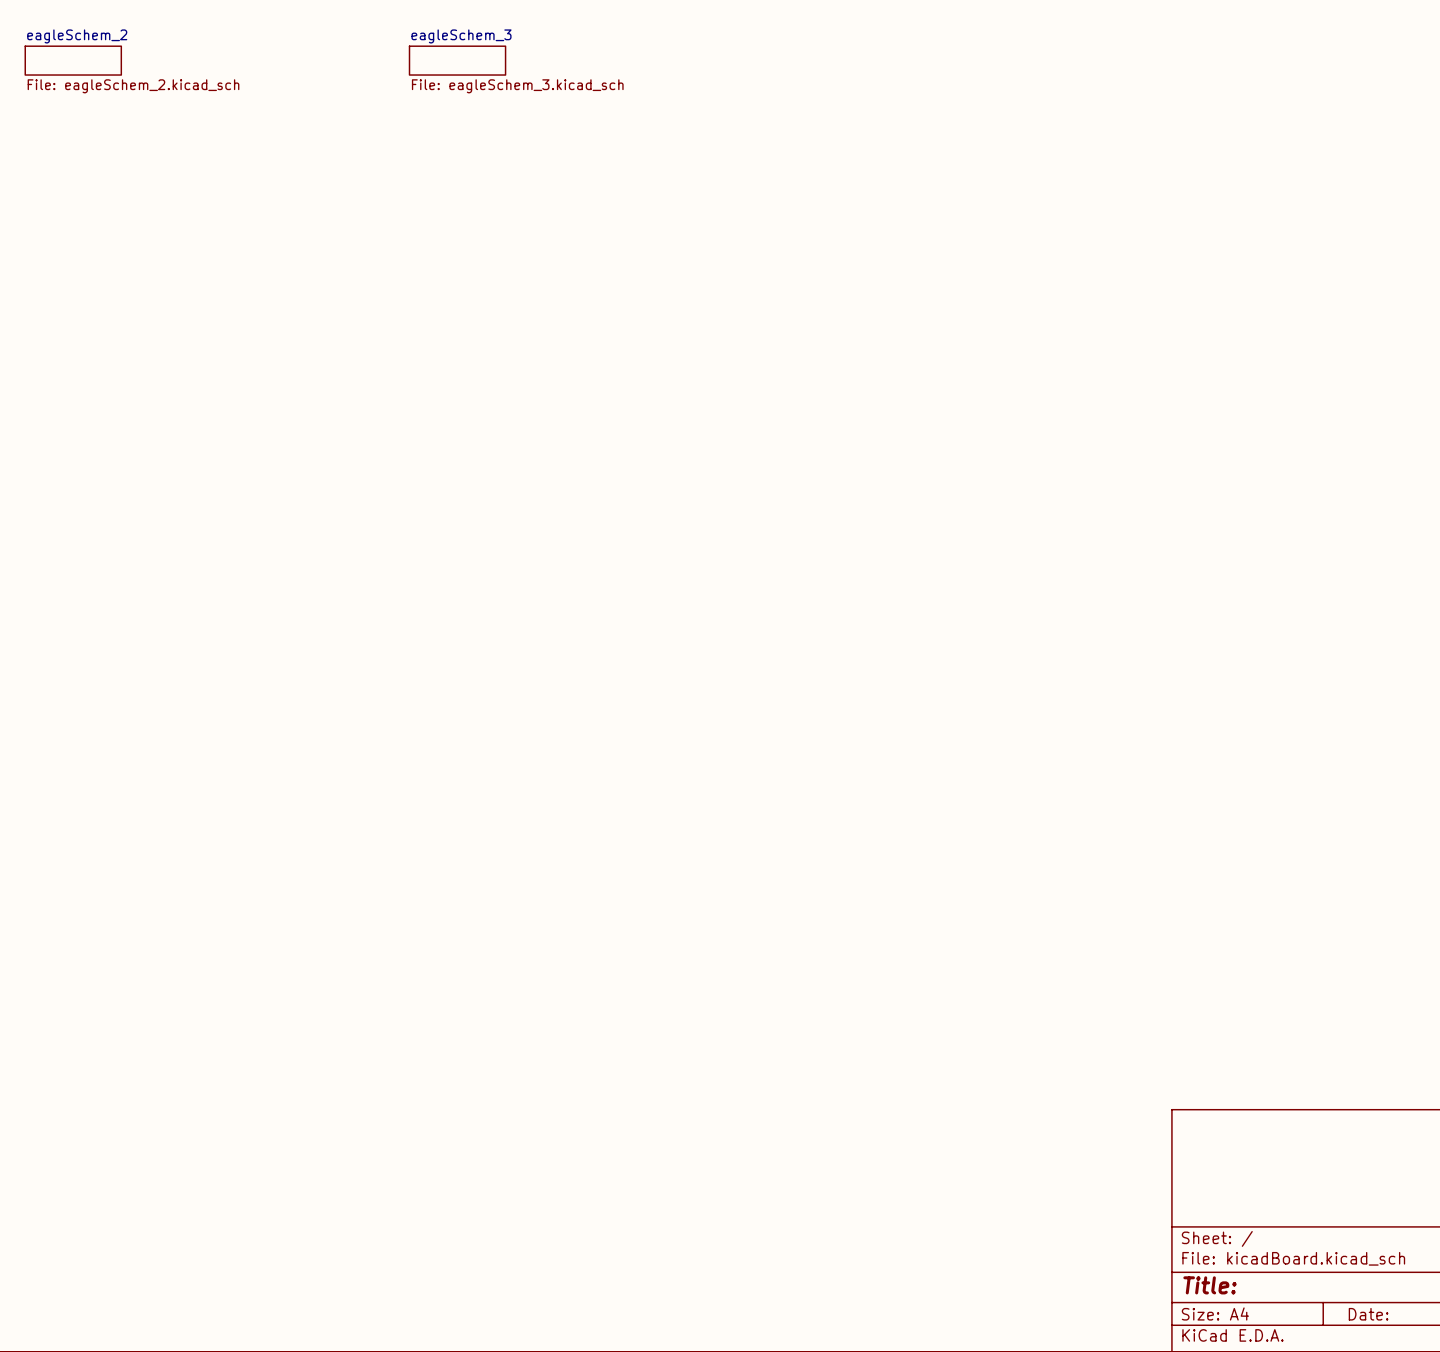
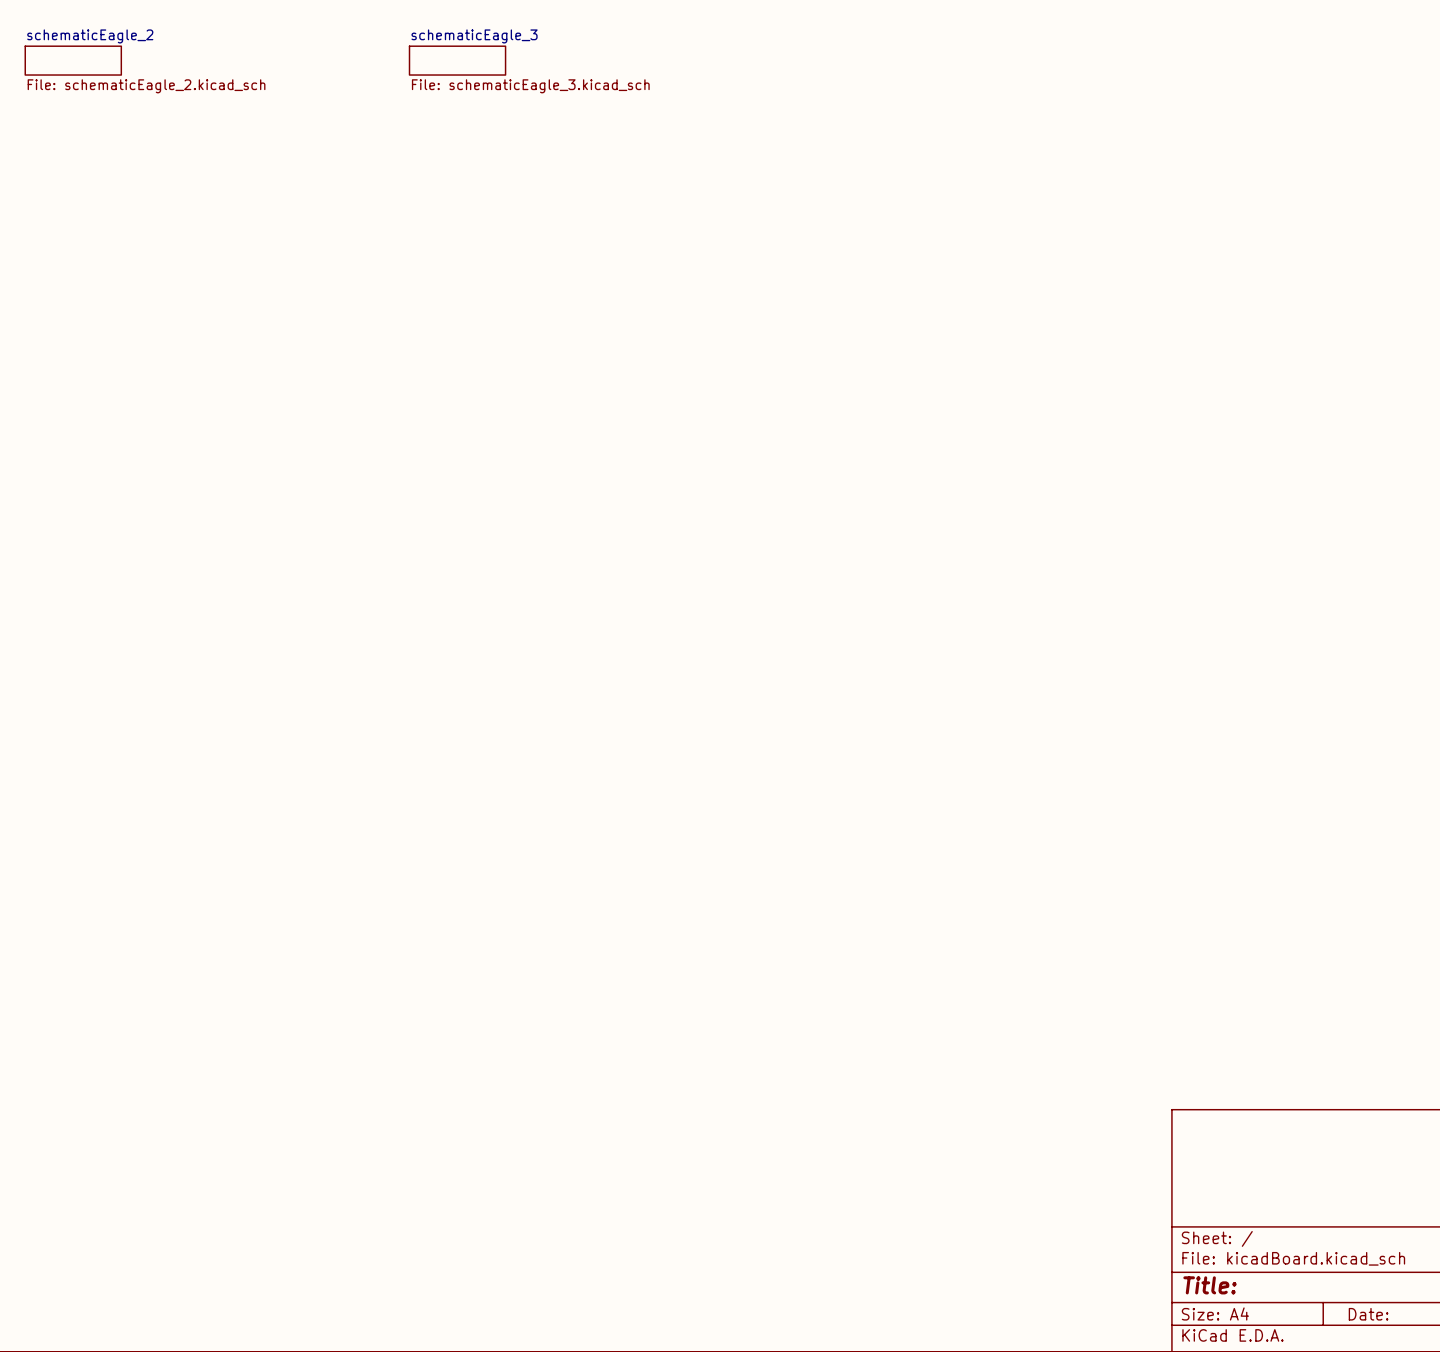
sheet eagleSchem_2 name: eagleSchem_2 (77, 36) -> schematicEagle_2 (90, 36)
sheet eagleSchem_3 name: eagleSchem_3 (461, 36) -> schematicEagle_3 (474, 36)
sheet eagleSchem_2 value: File: eagleSchem_2.kicad_sch (133, 86) -> File: schematicEagle_2.kicad_sch (146, 86)
sheet eagleSchem_3 value: File: eagleSchem_3.kicad_sch (517, 86) -> File: schematicEagle_3.kicad_sch (530, 86)

